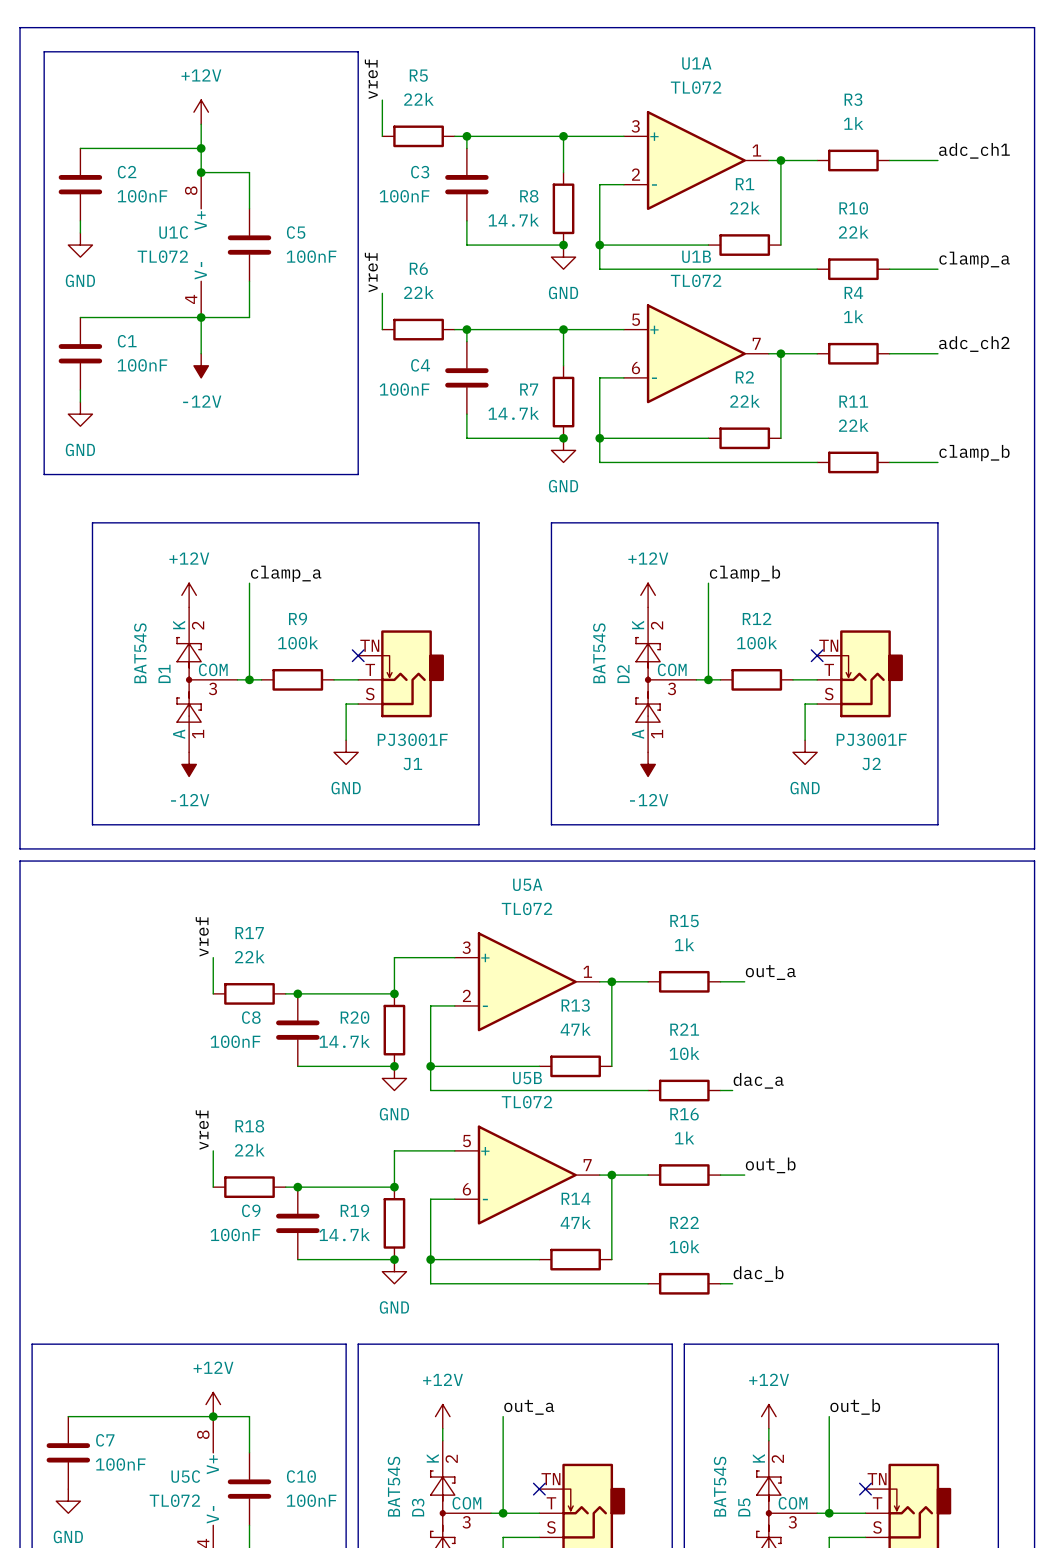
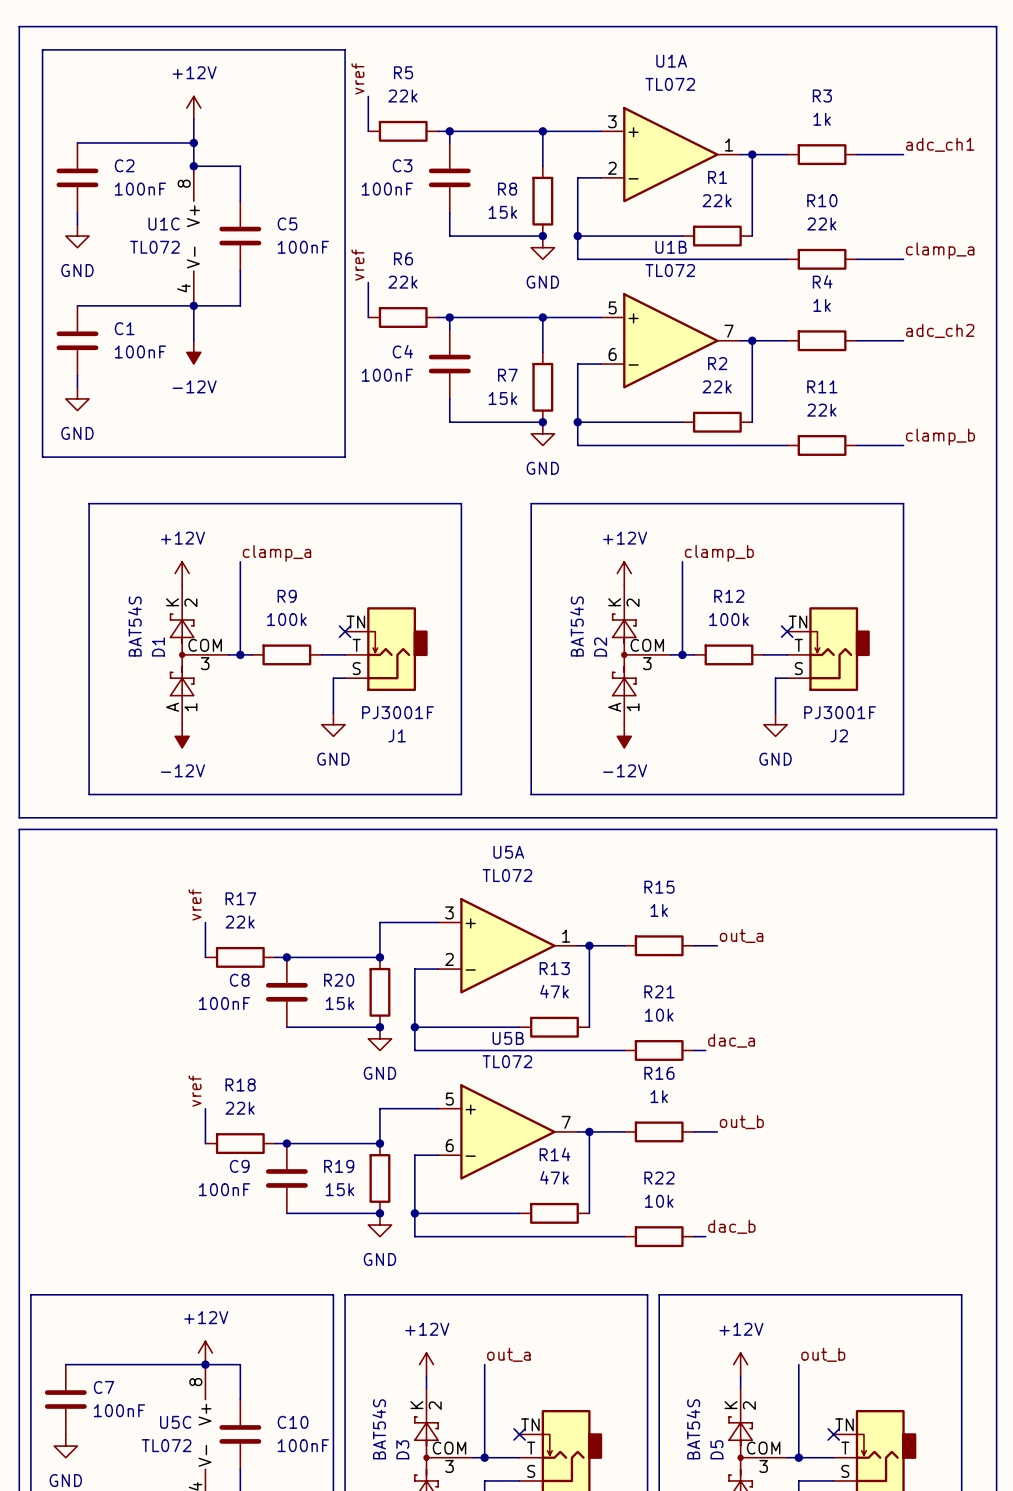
R8 value: 14.7k (513, 220) -> 15k (502, 212)
R7 value: 14.7k (513, 413) -> 15k (502, 398)
R20 value: 14.7k (344, 1041) -> 15k (339, 1003)
R19 value: 14.7k (344, 1234) -> 15k (339, 1189)

